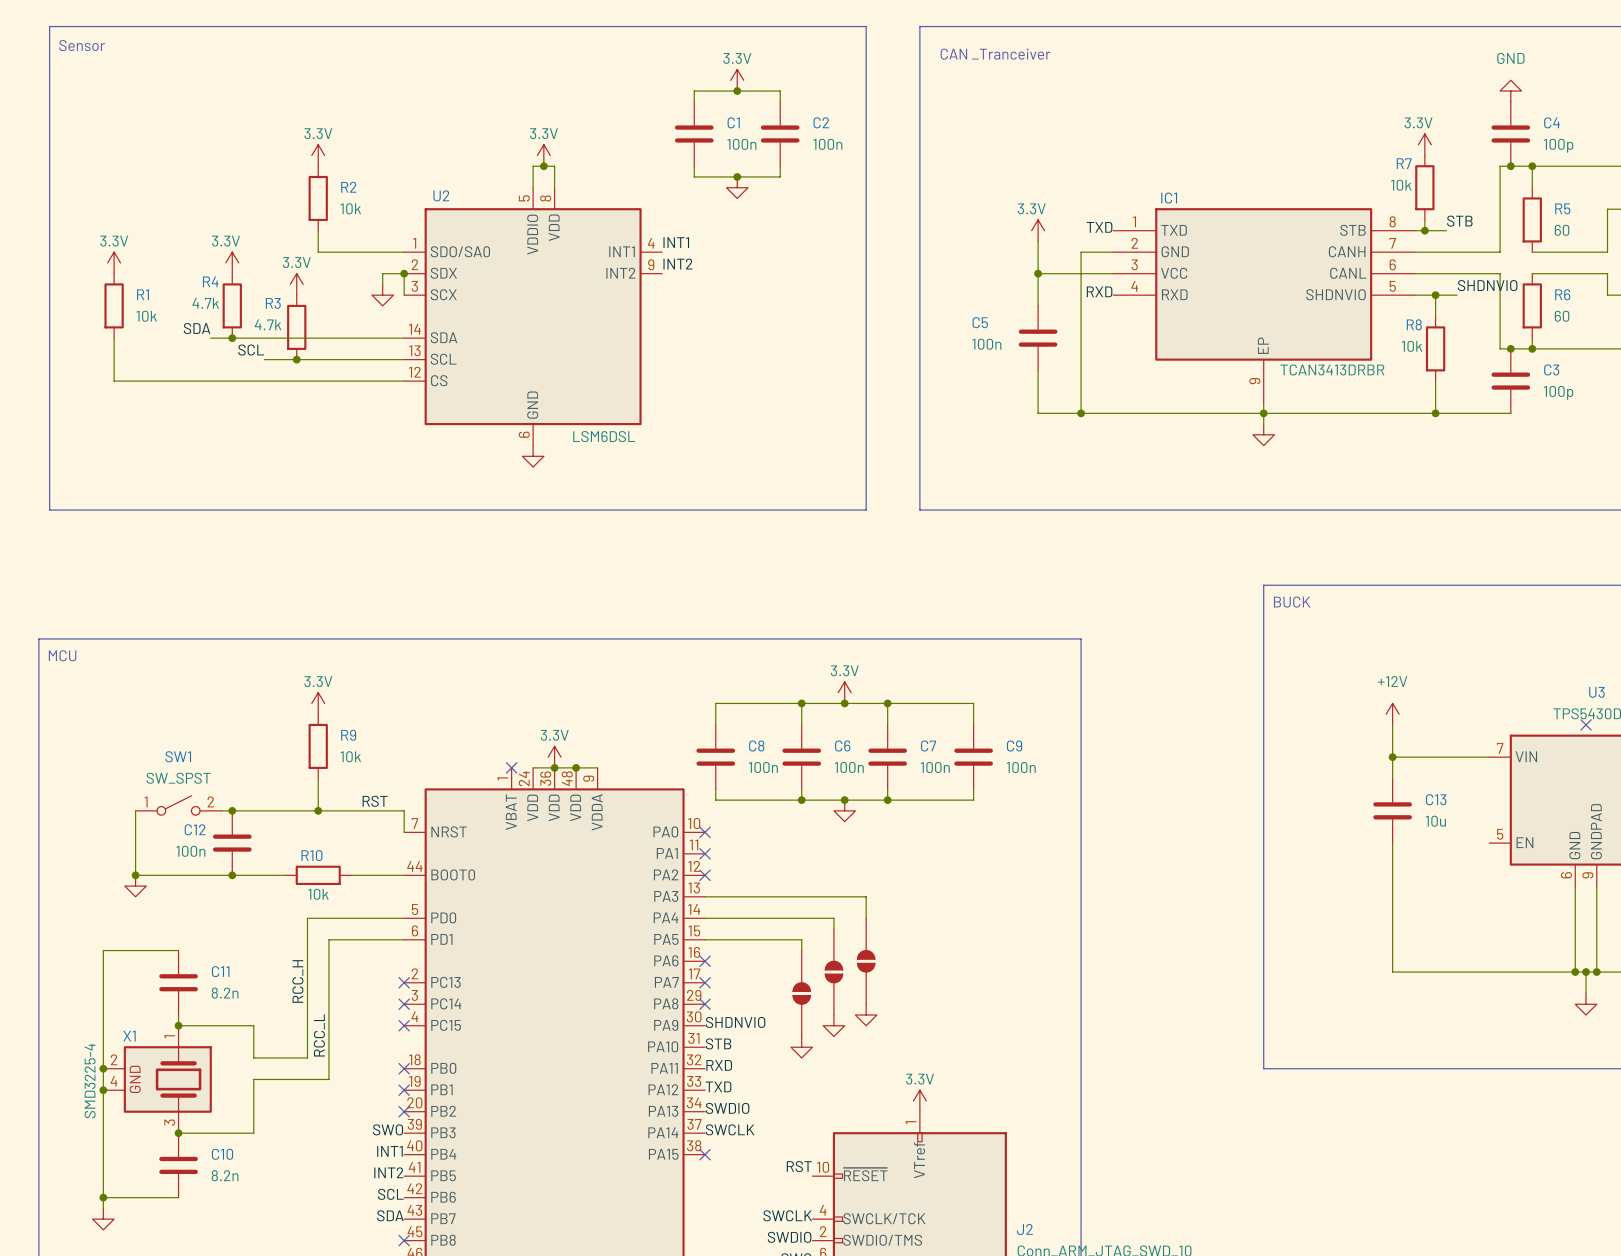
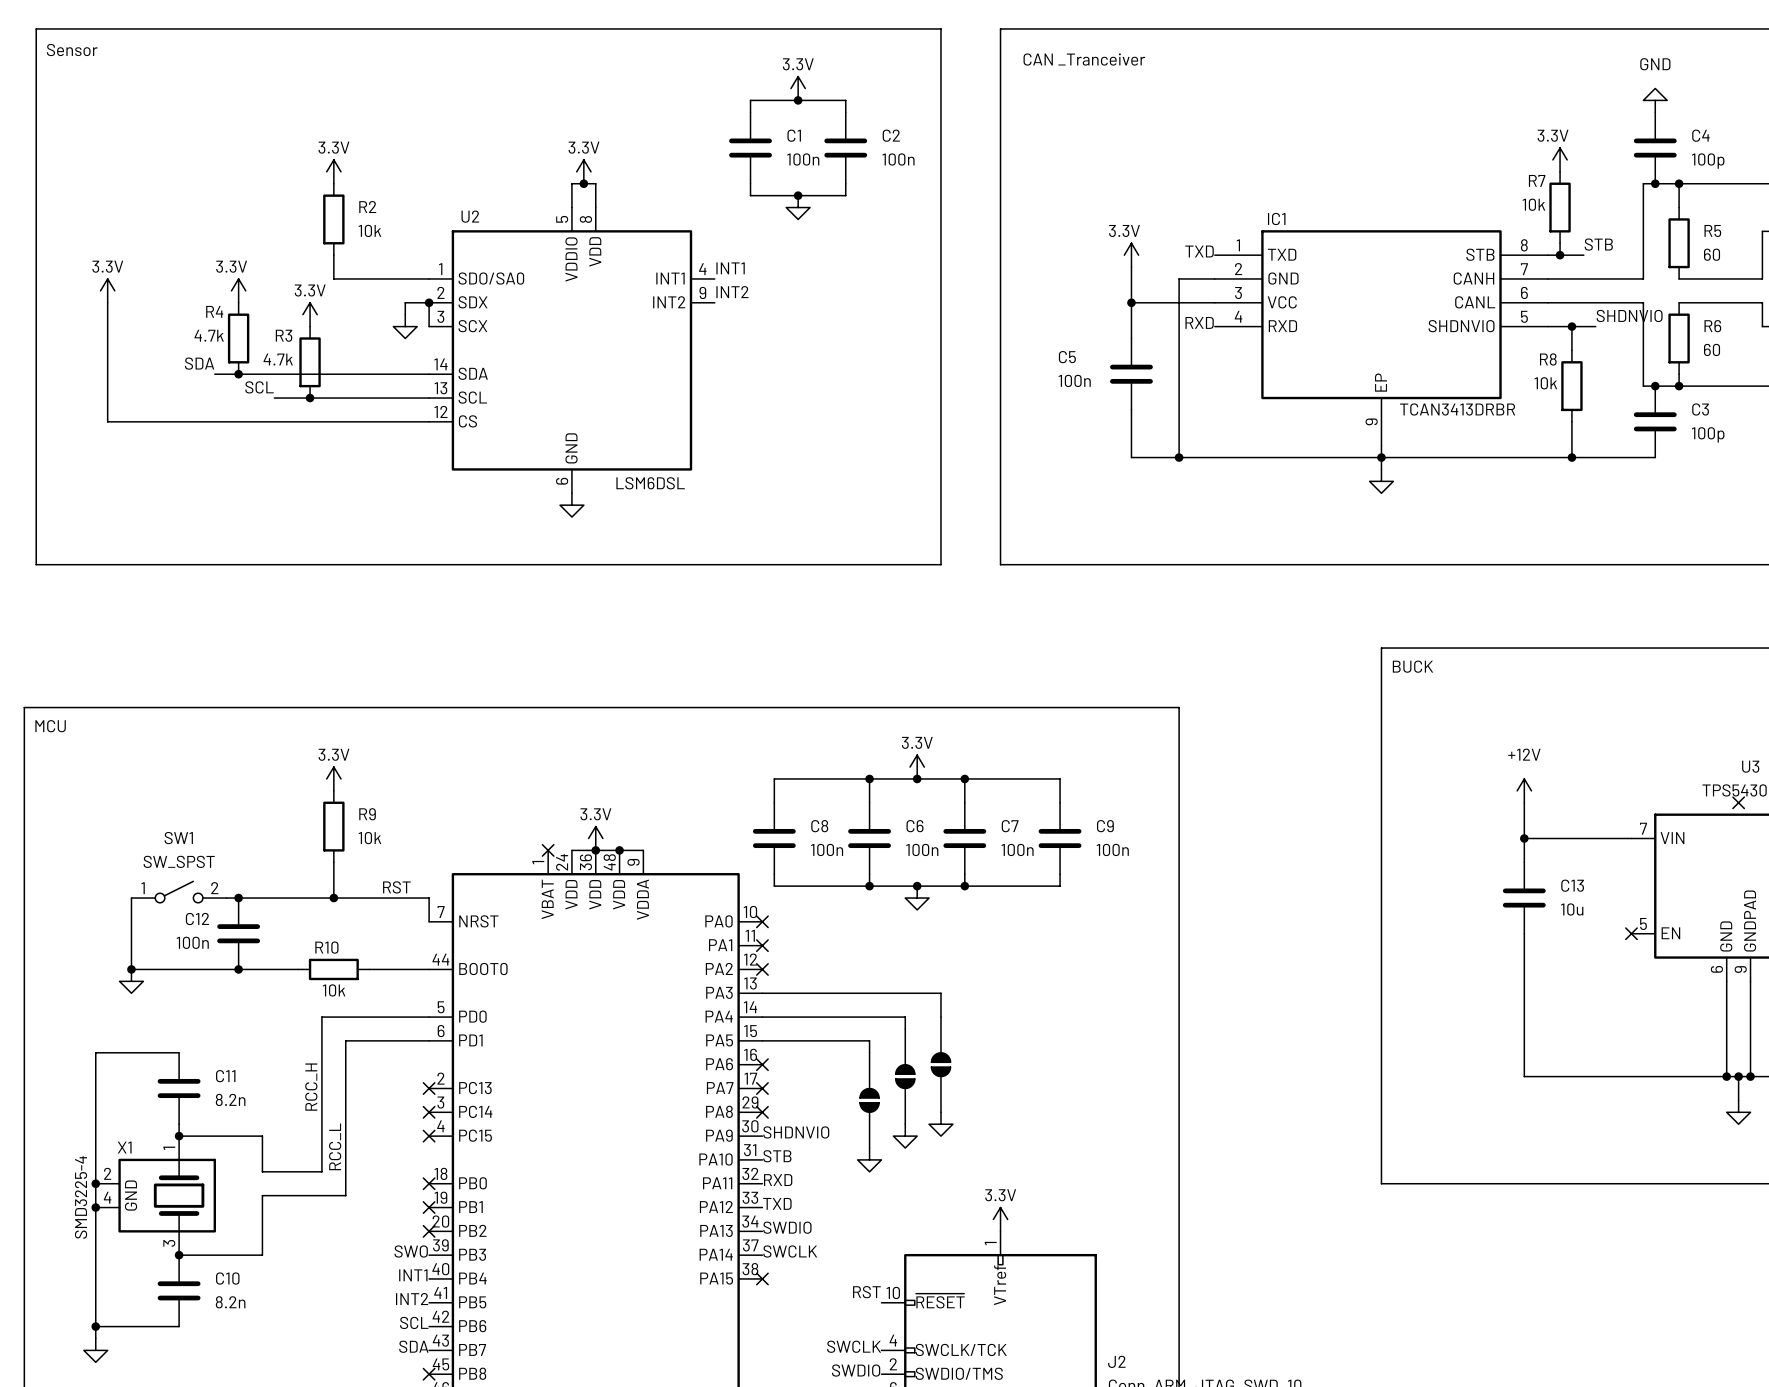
wire: none -> (107, 302) (107, 374)
R1: 10k (114, 305) -> none
no-connect mark: none -> (1631, 933)

